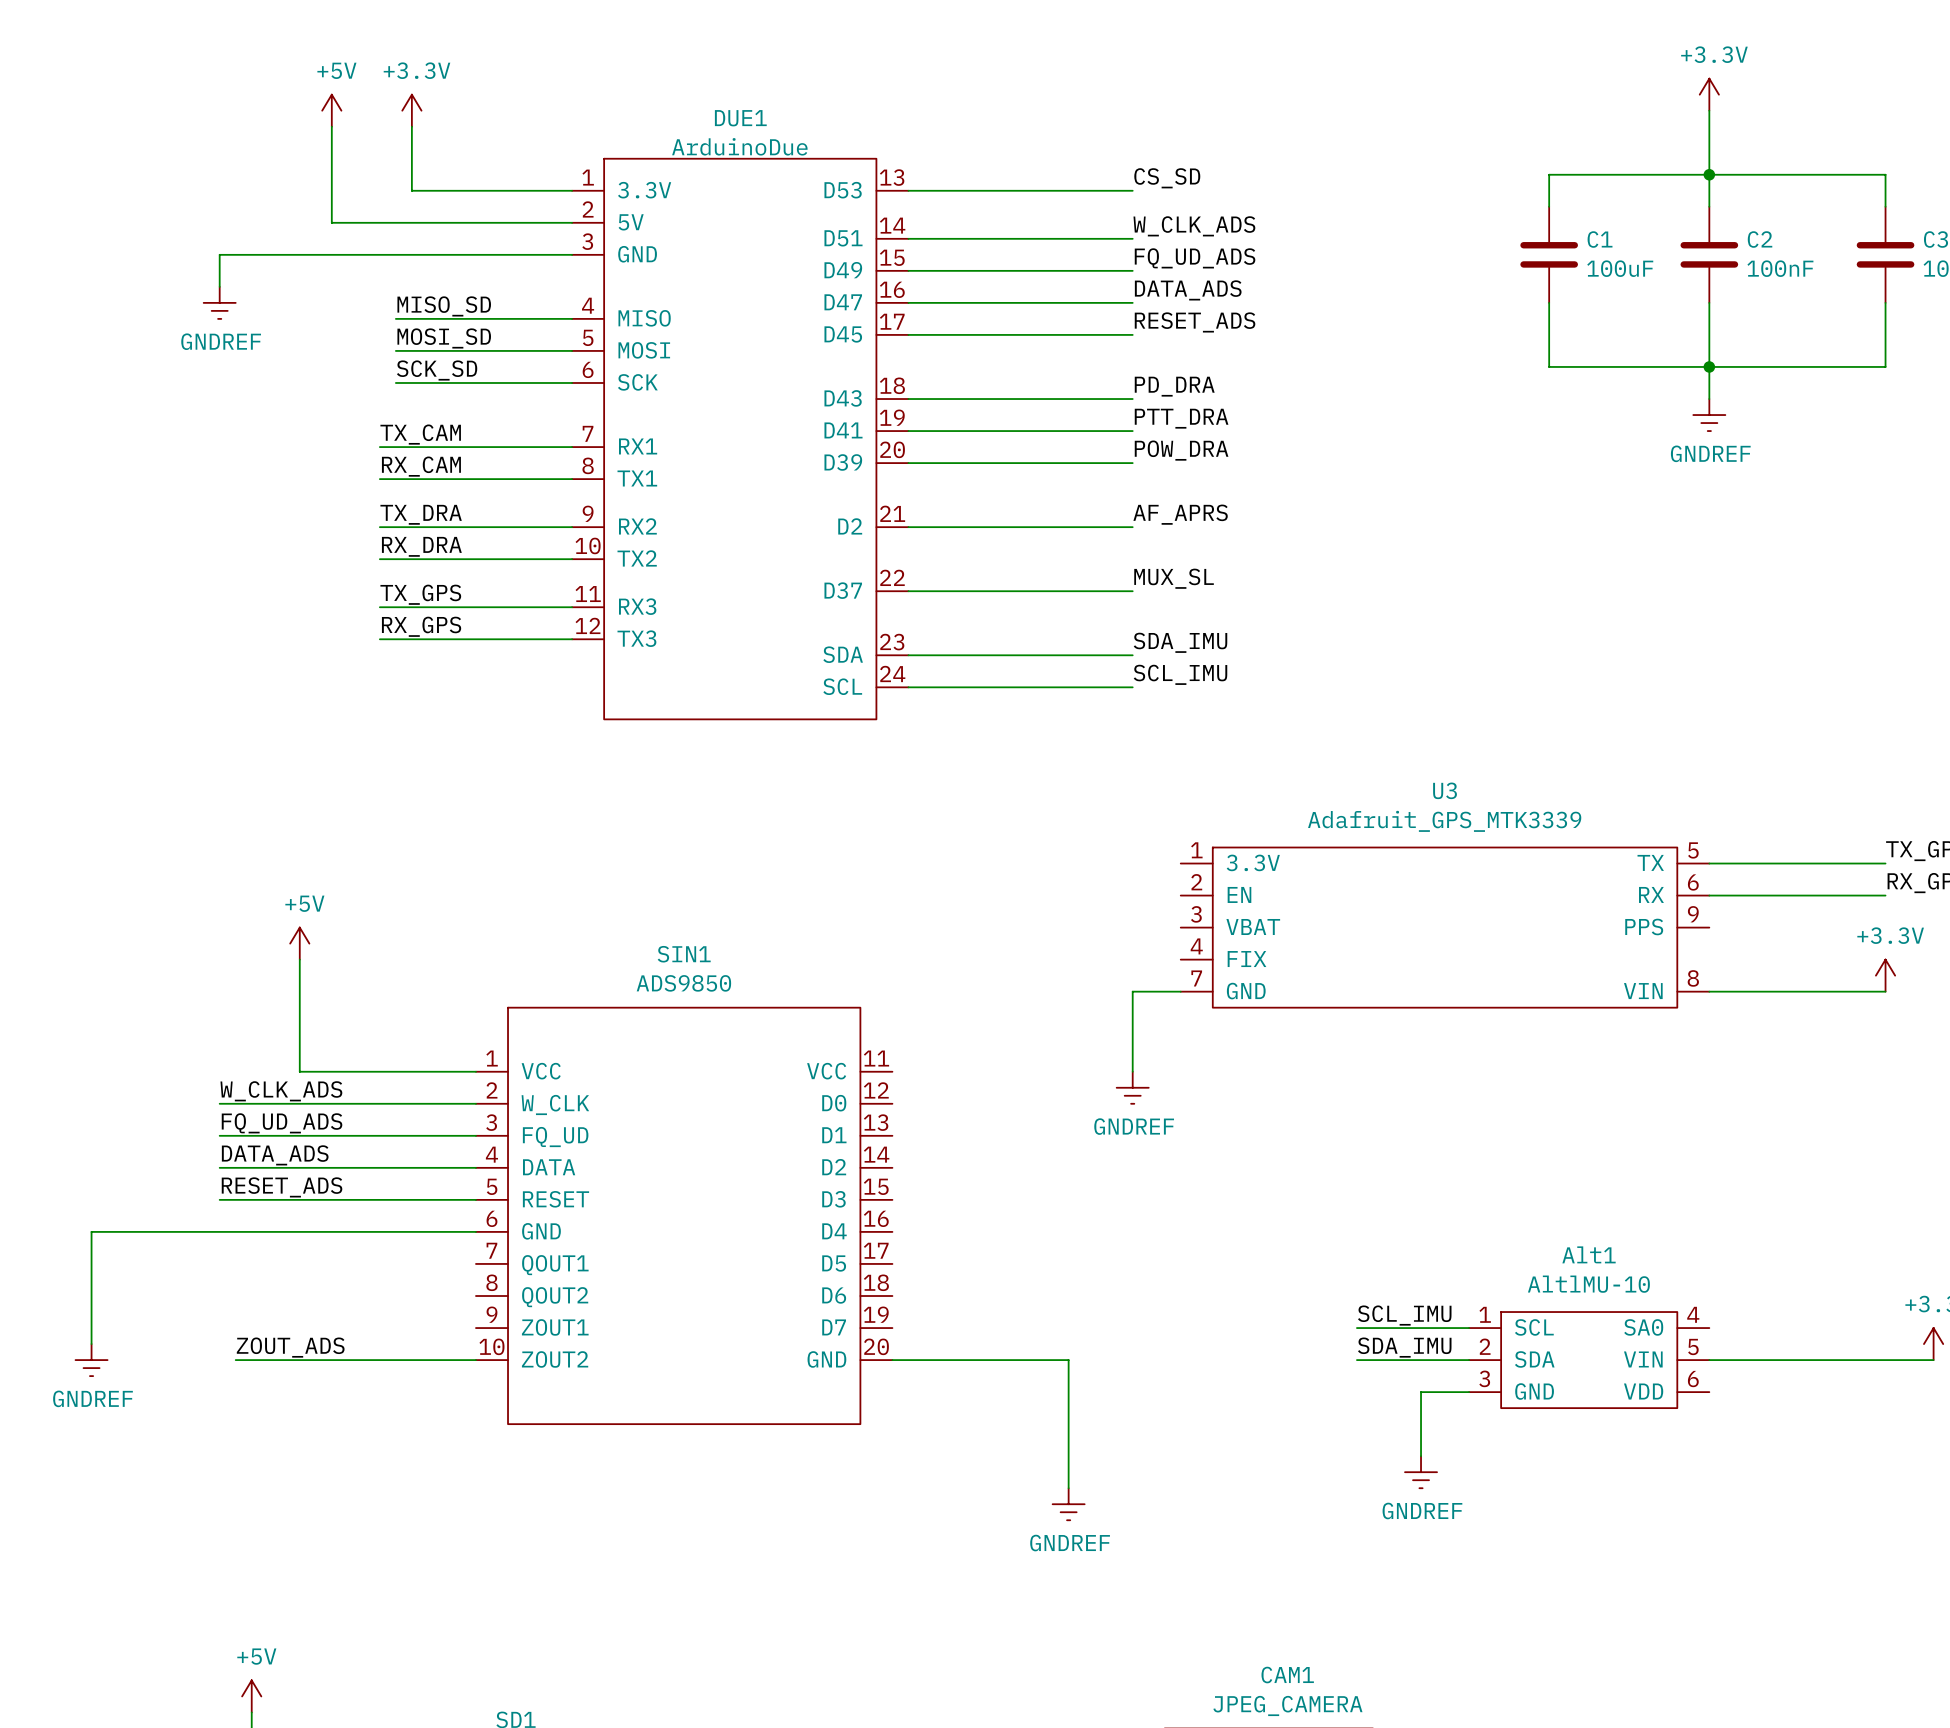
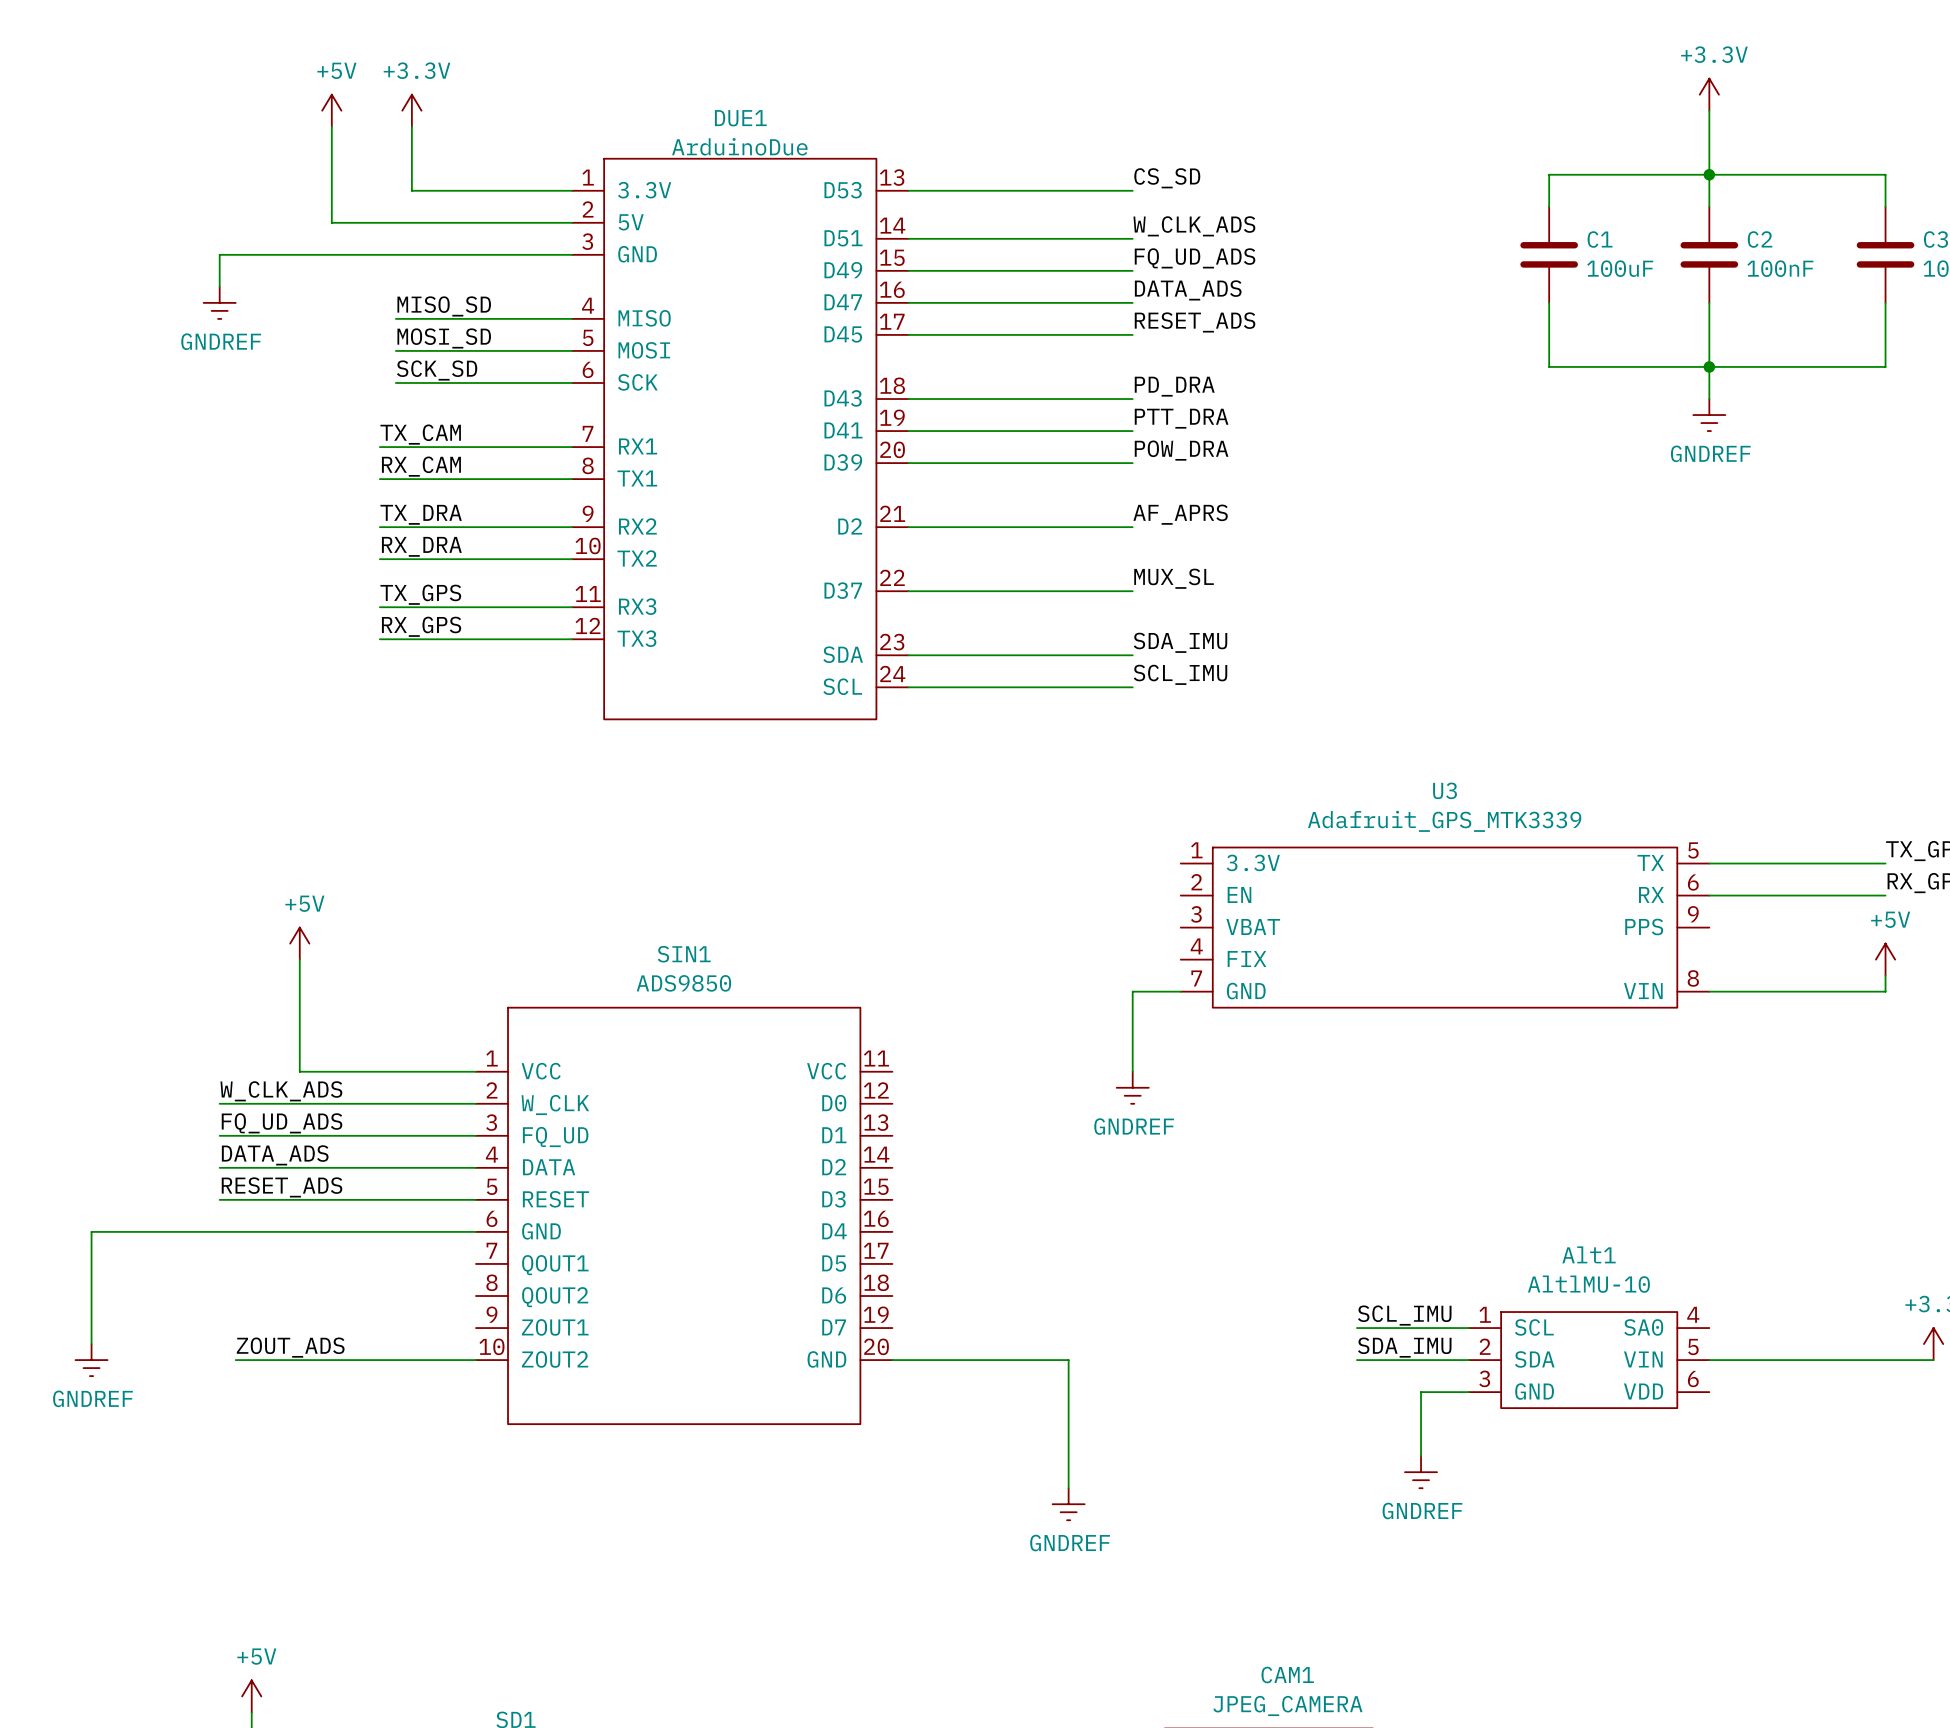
power symbol: none -> +5V (1885, 959)
power symbol: +3.3V (1885, 975) -> none

